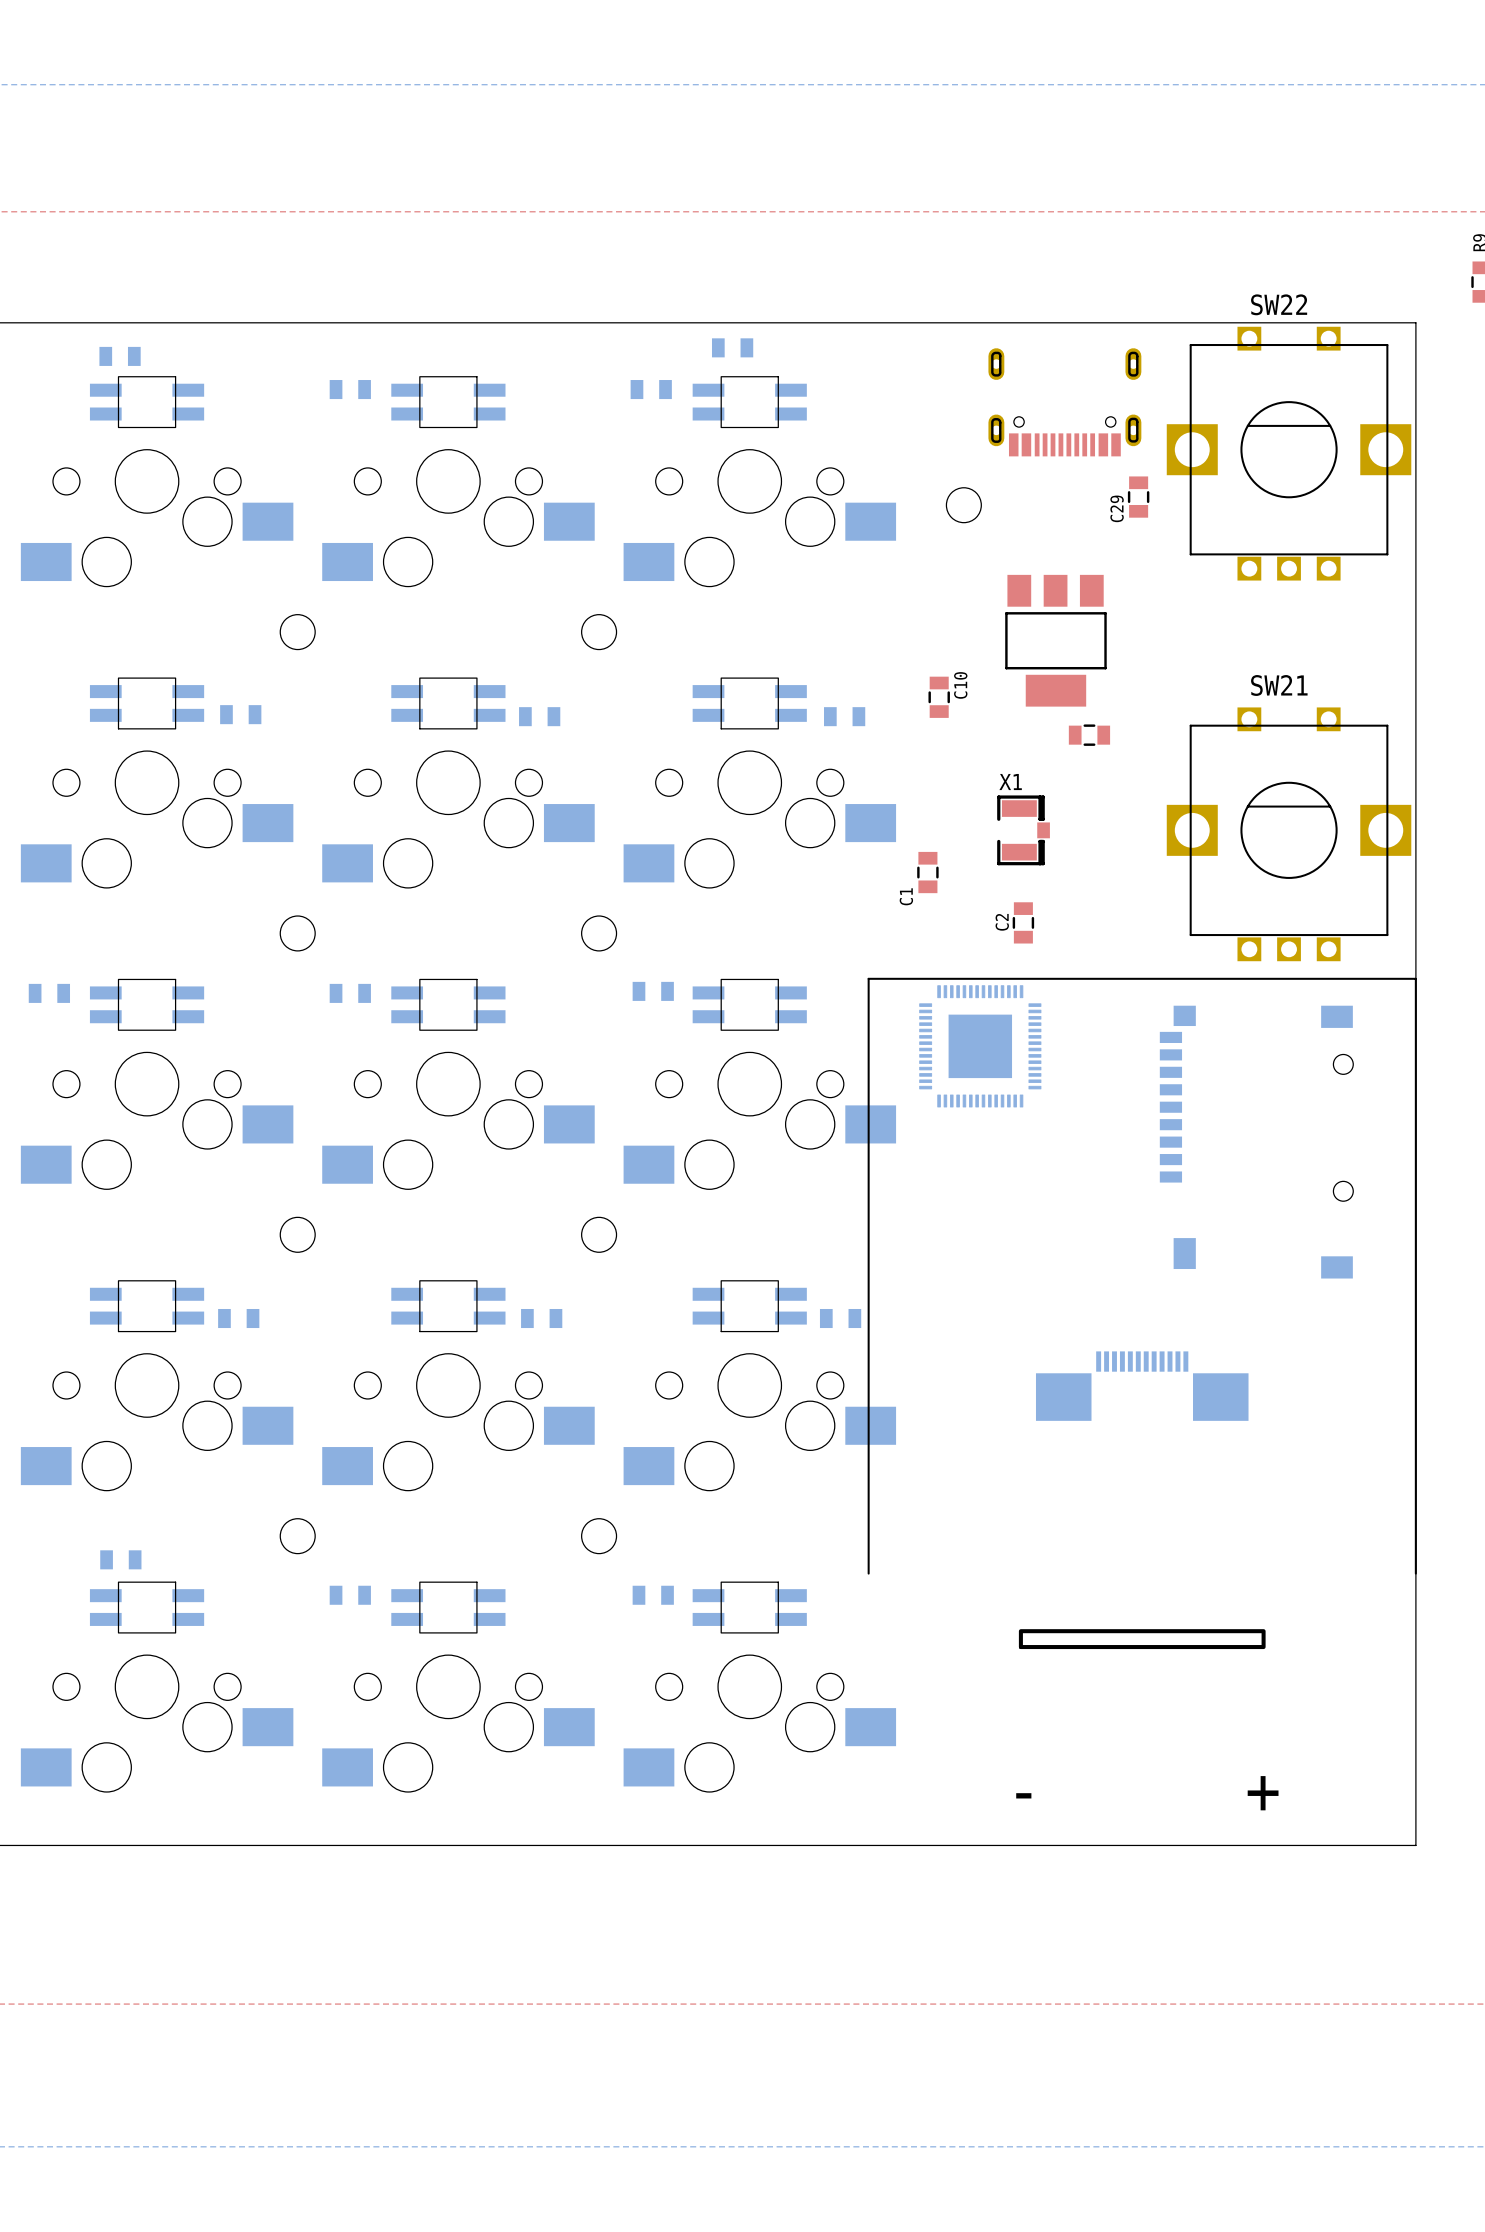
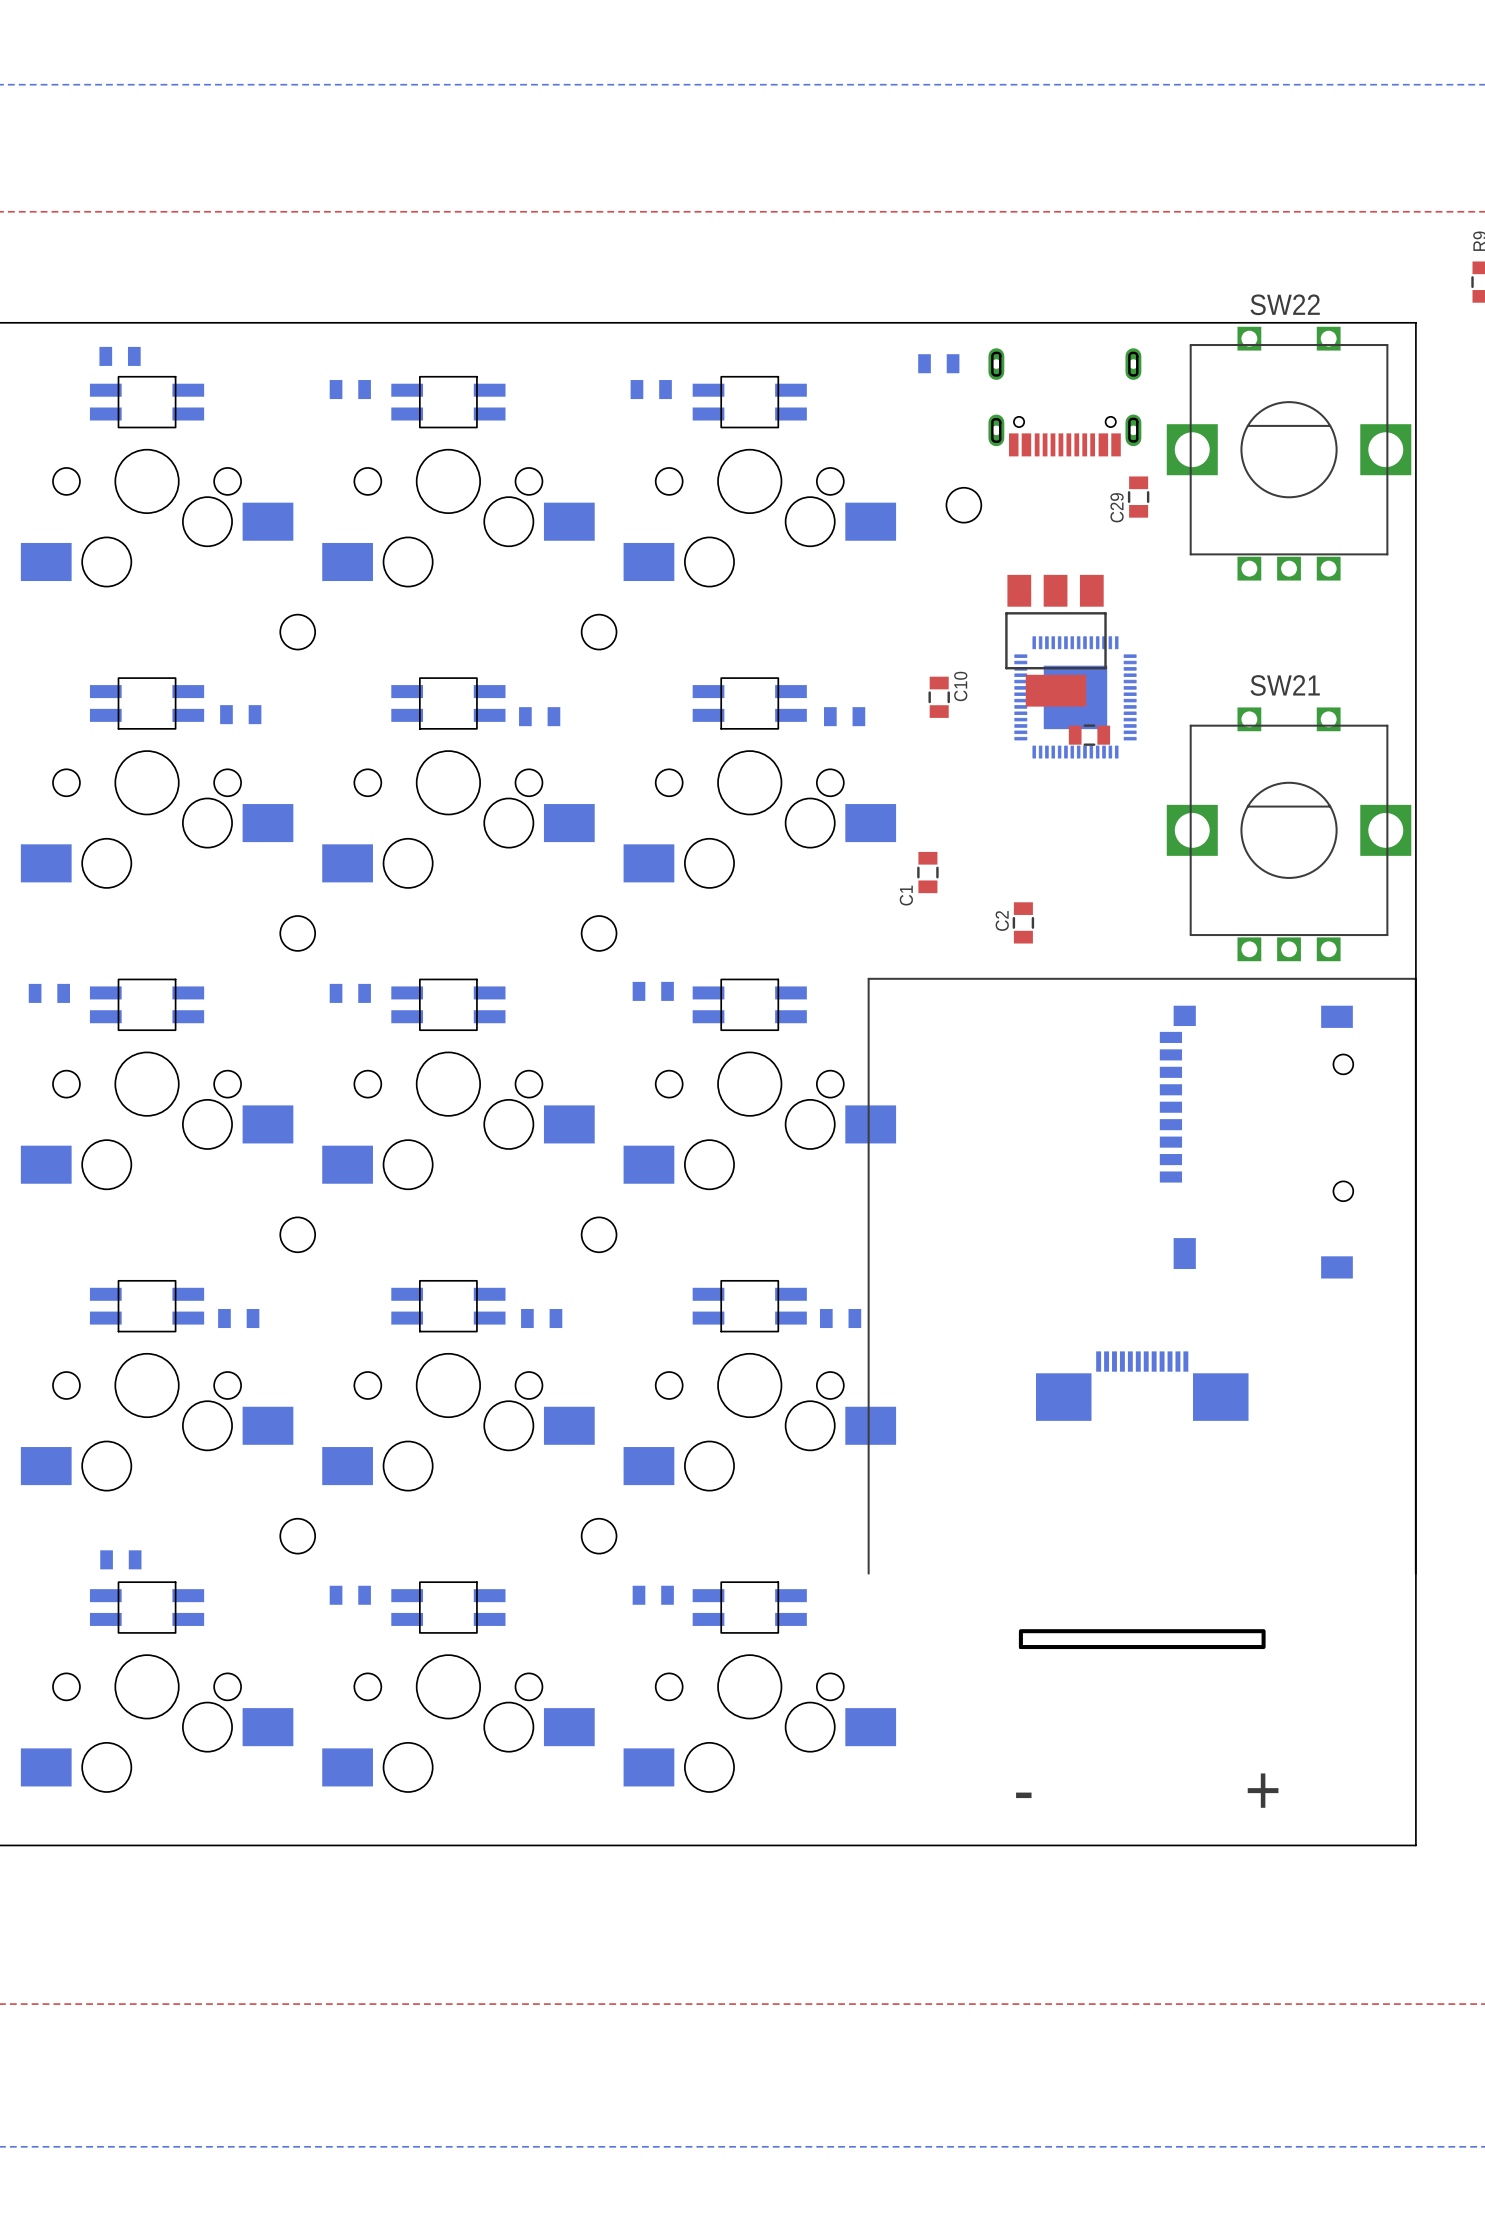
part position: (732, 347) -> (938, 363)
X1: (1023, 830) -> none
part position: (980, 1046) -> (1075, 697)

